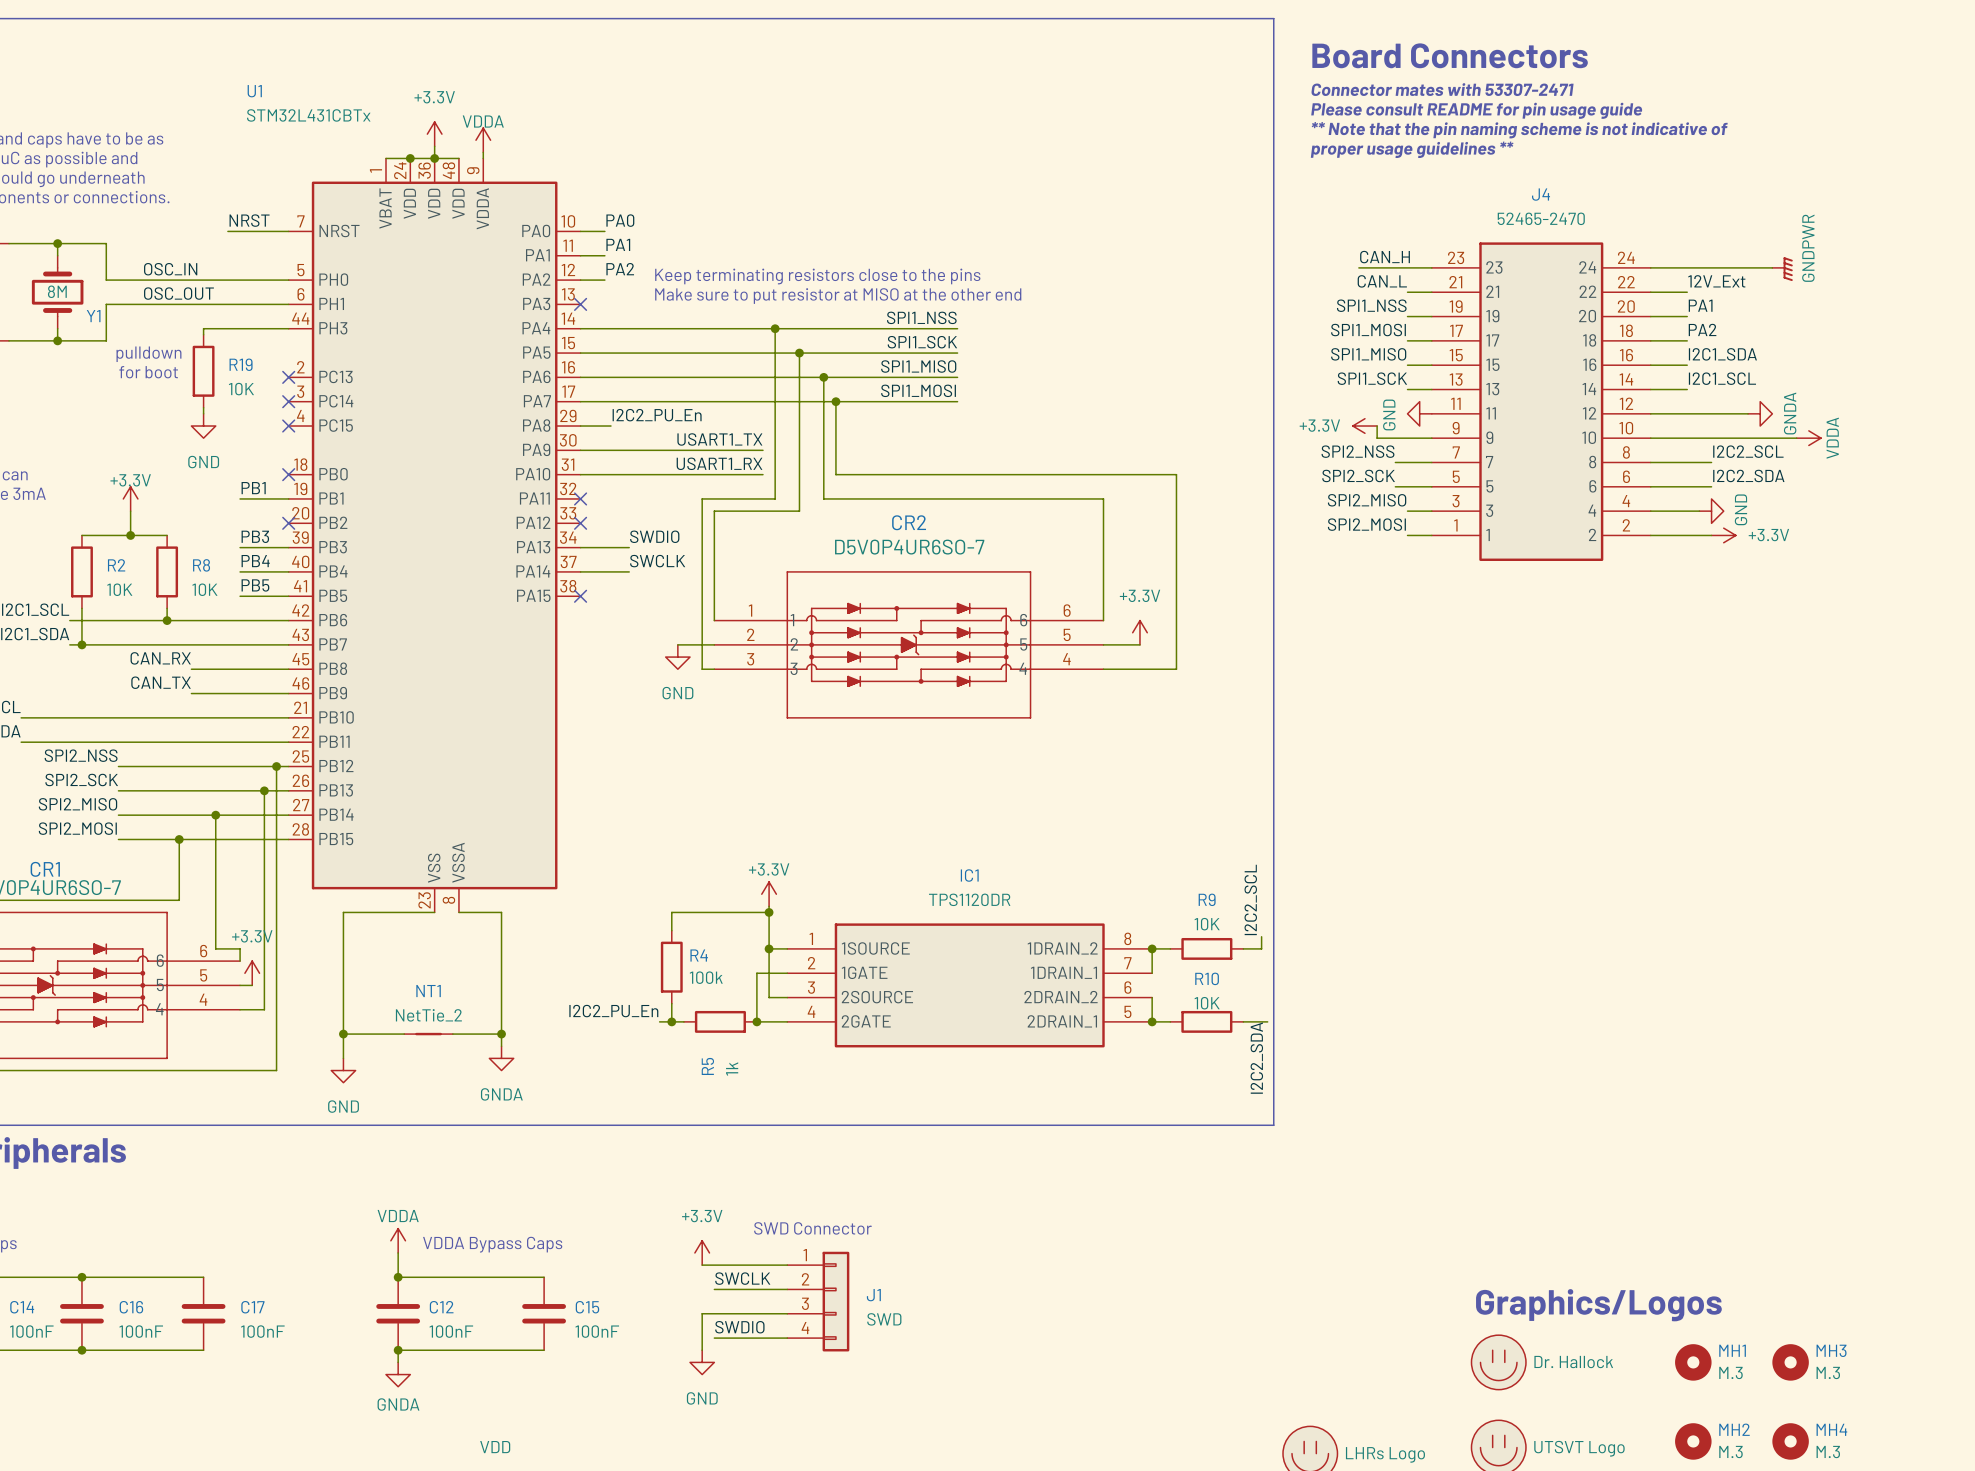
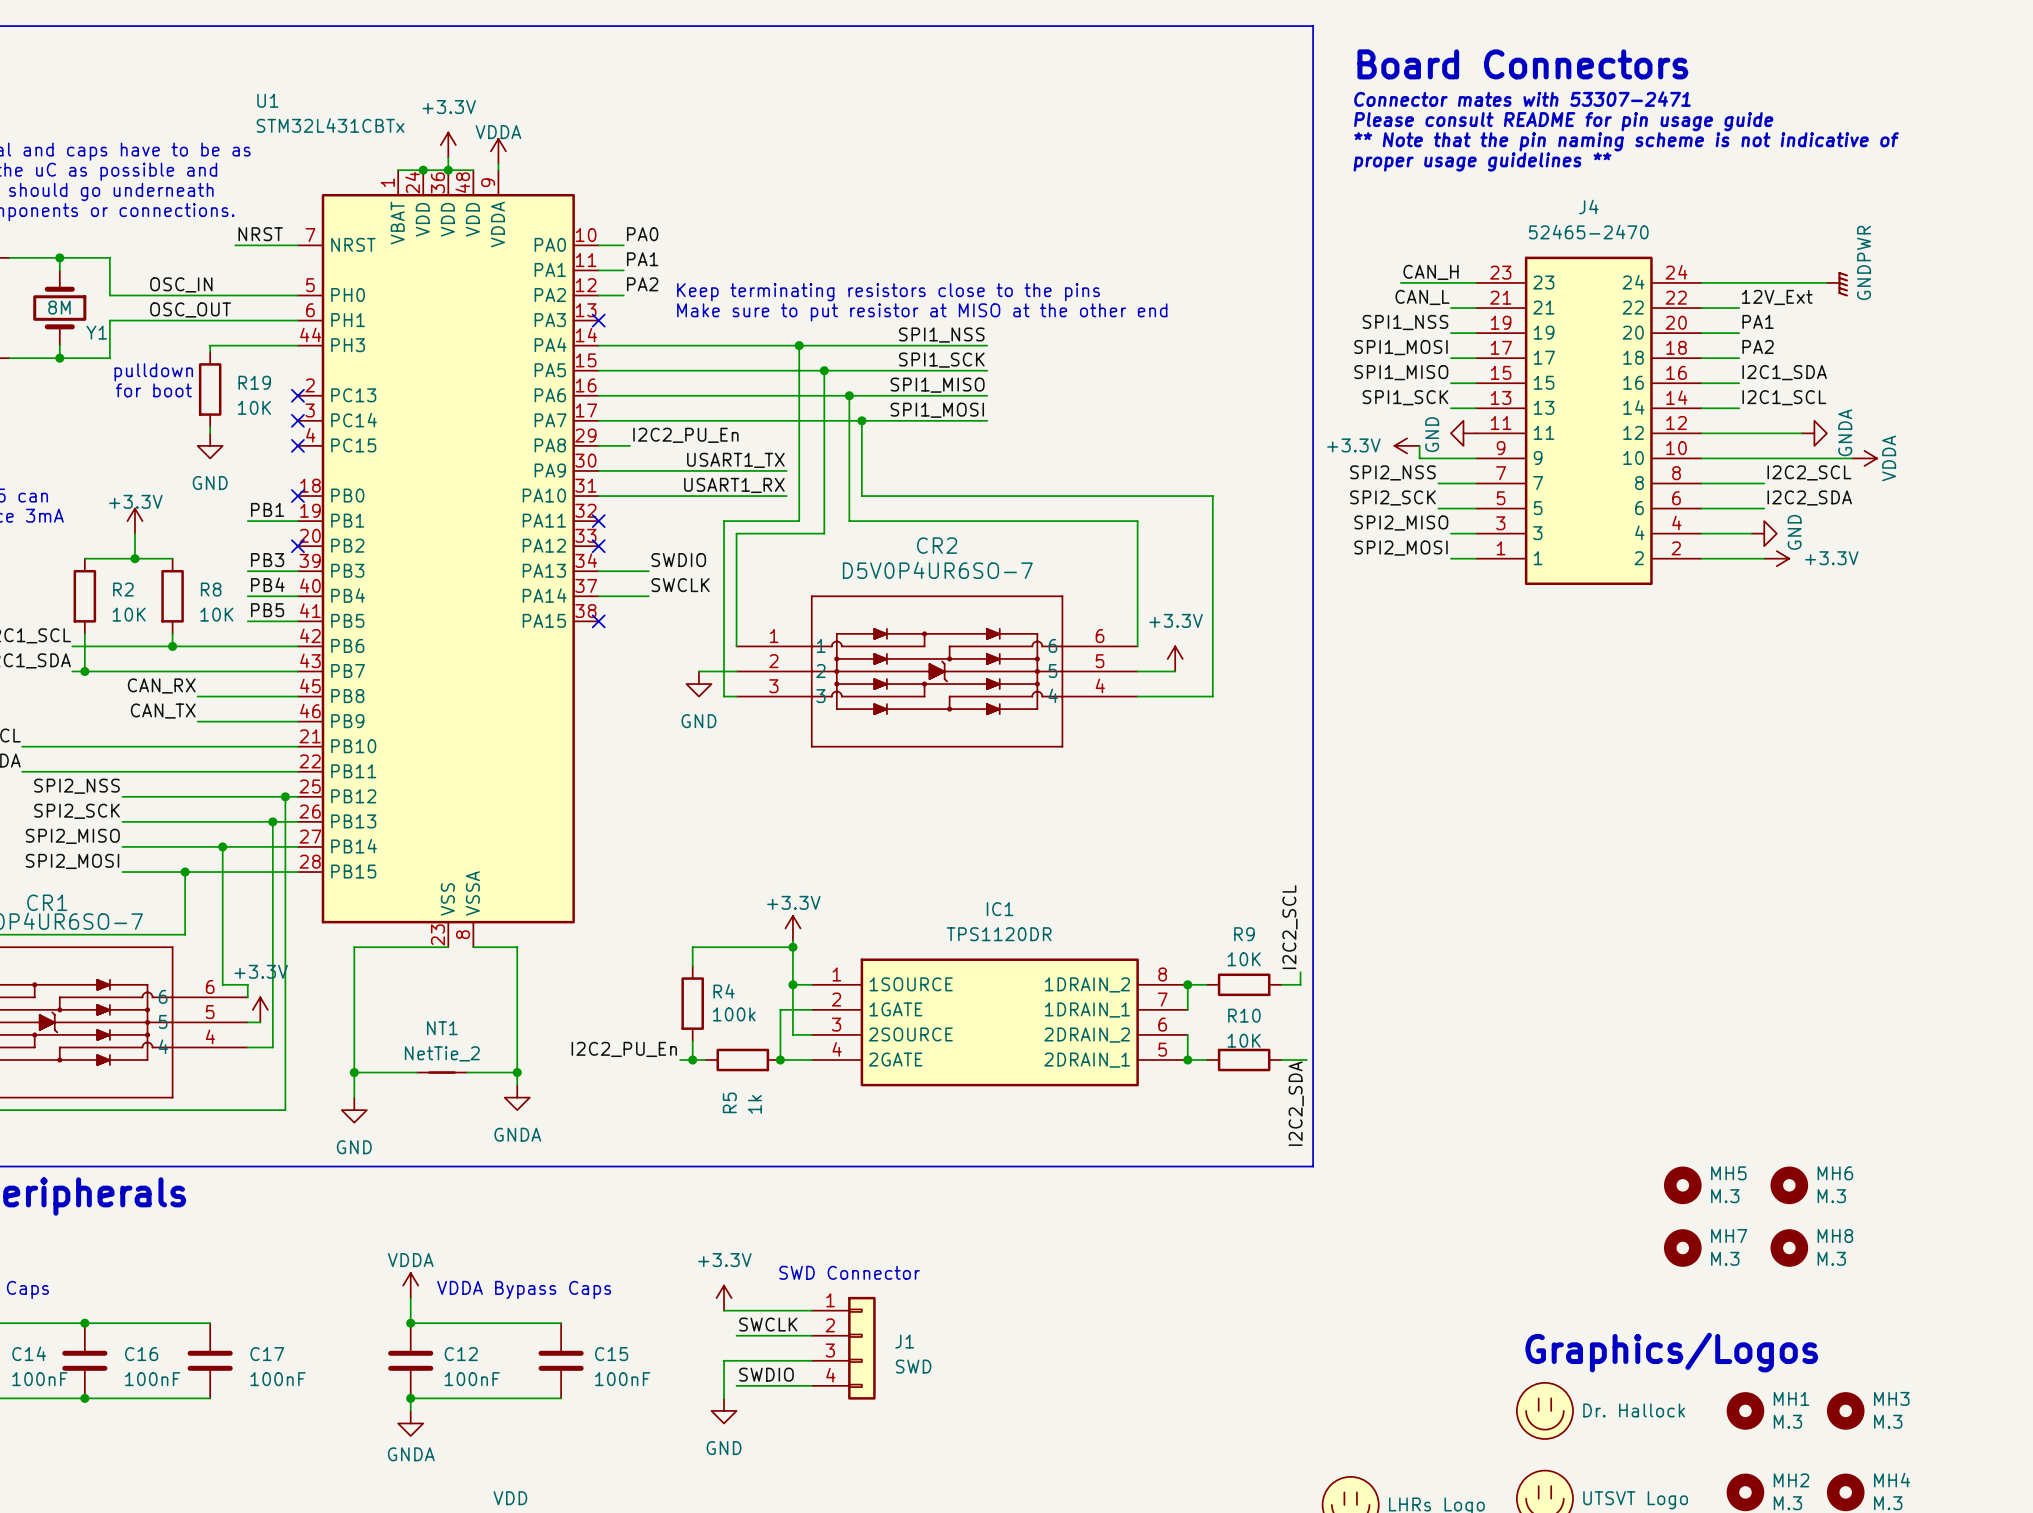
MH5: none -> M.3 (1682, 1185)
MH6: none -> M.3 (1789, 1185)
MH7: none -> M.3 (1682, 1248)
MH8: none -> M.3 (1789, 1248)

